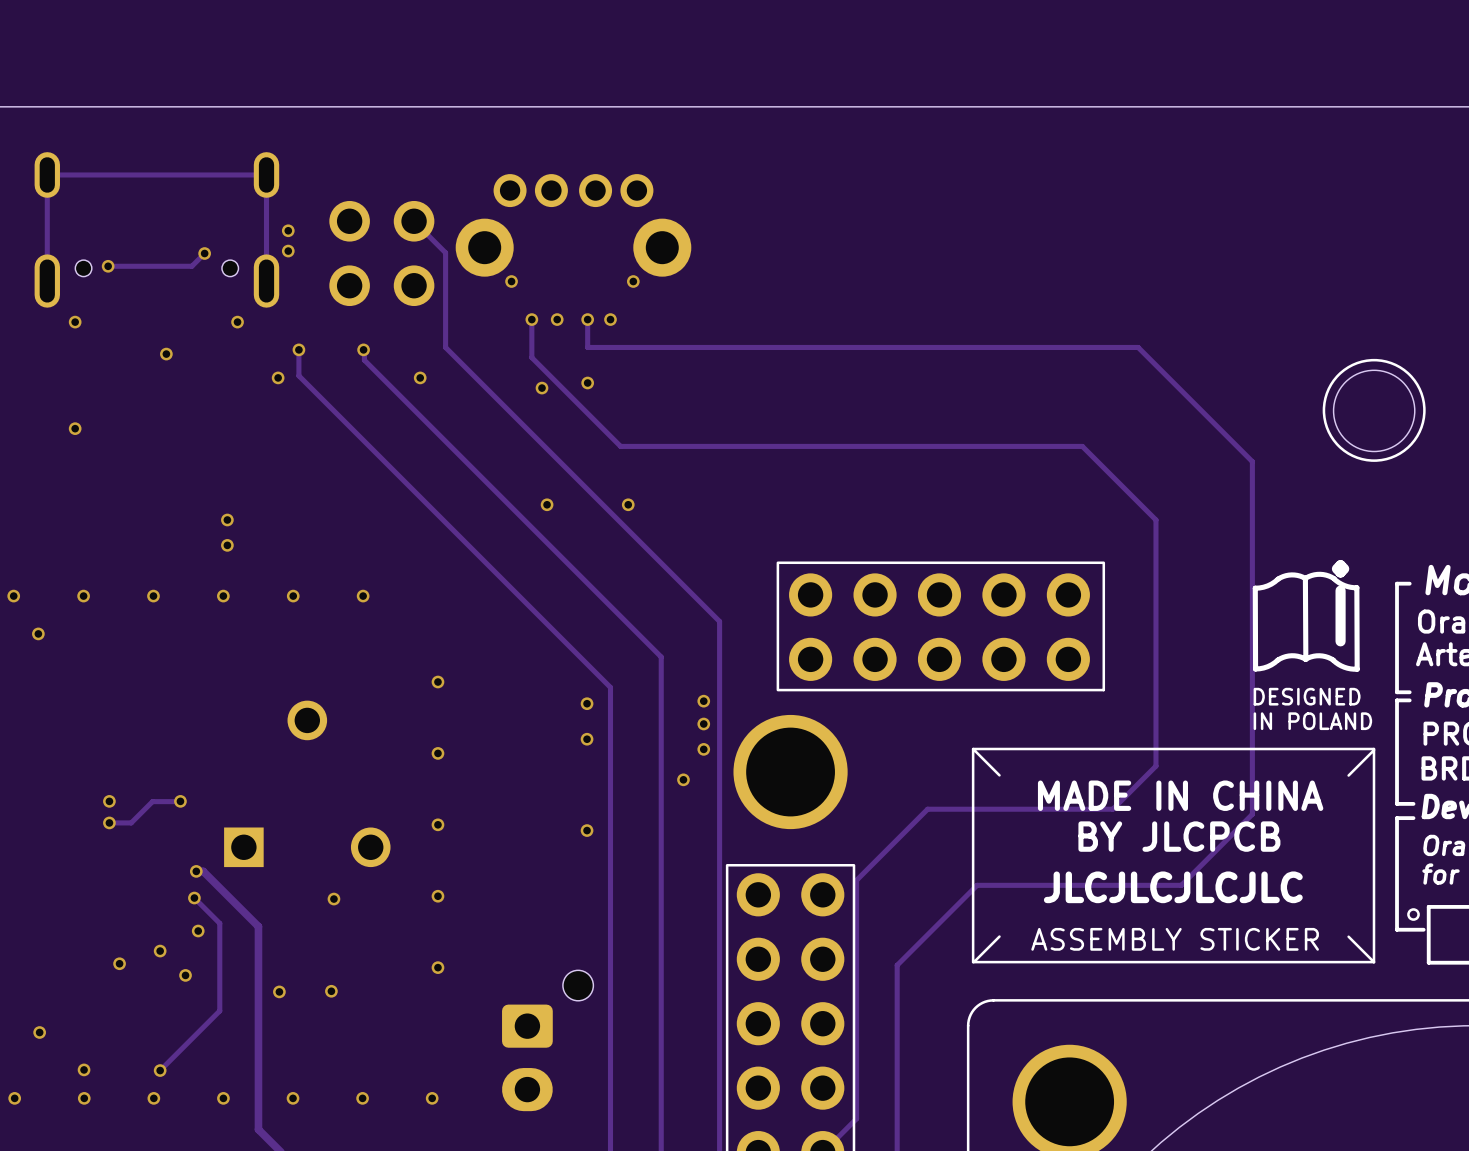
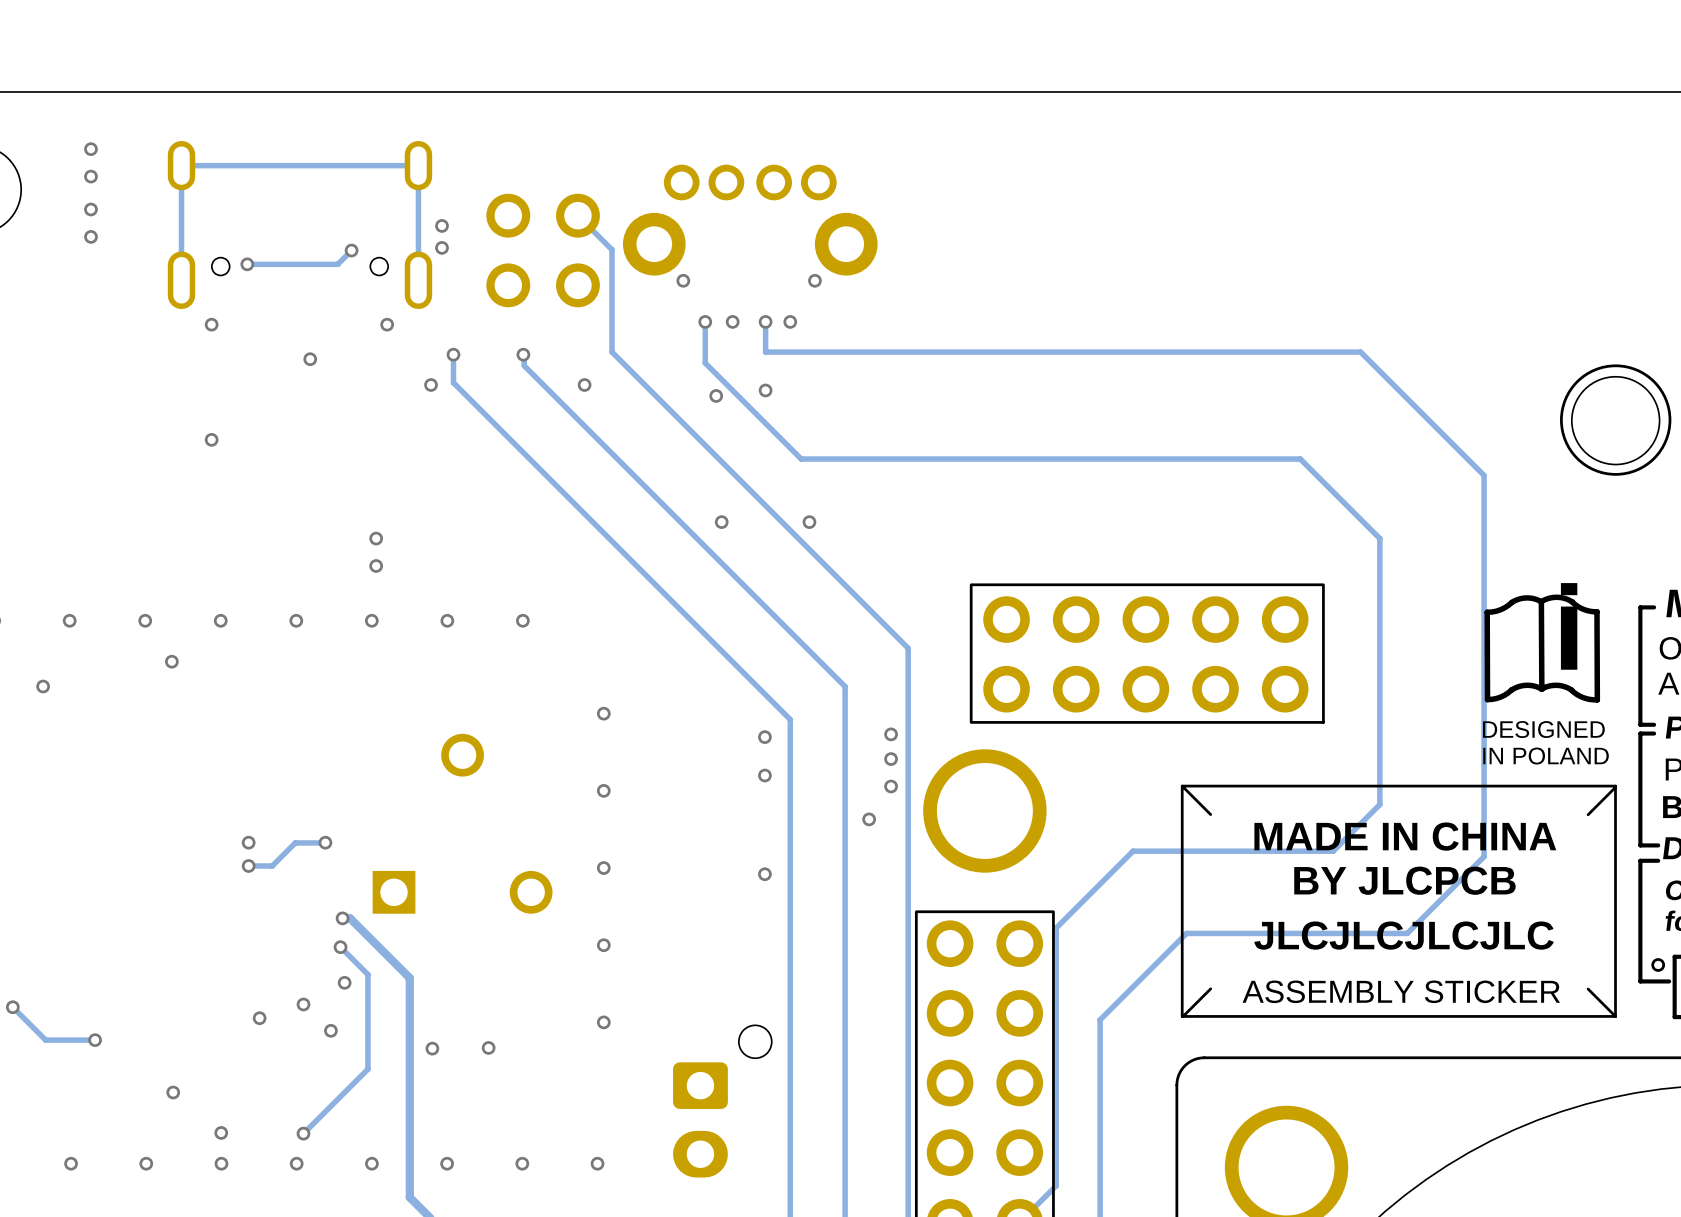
via: (333, 899) -> none

